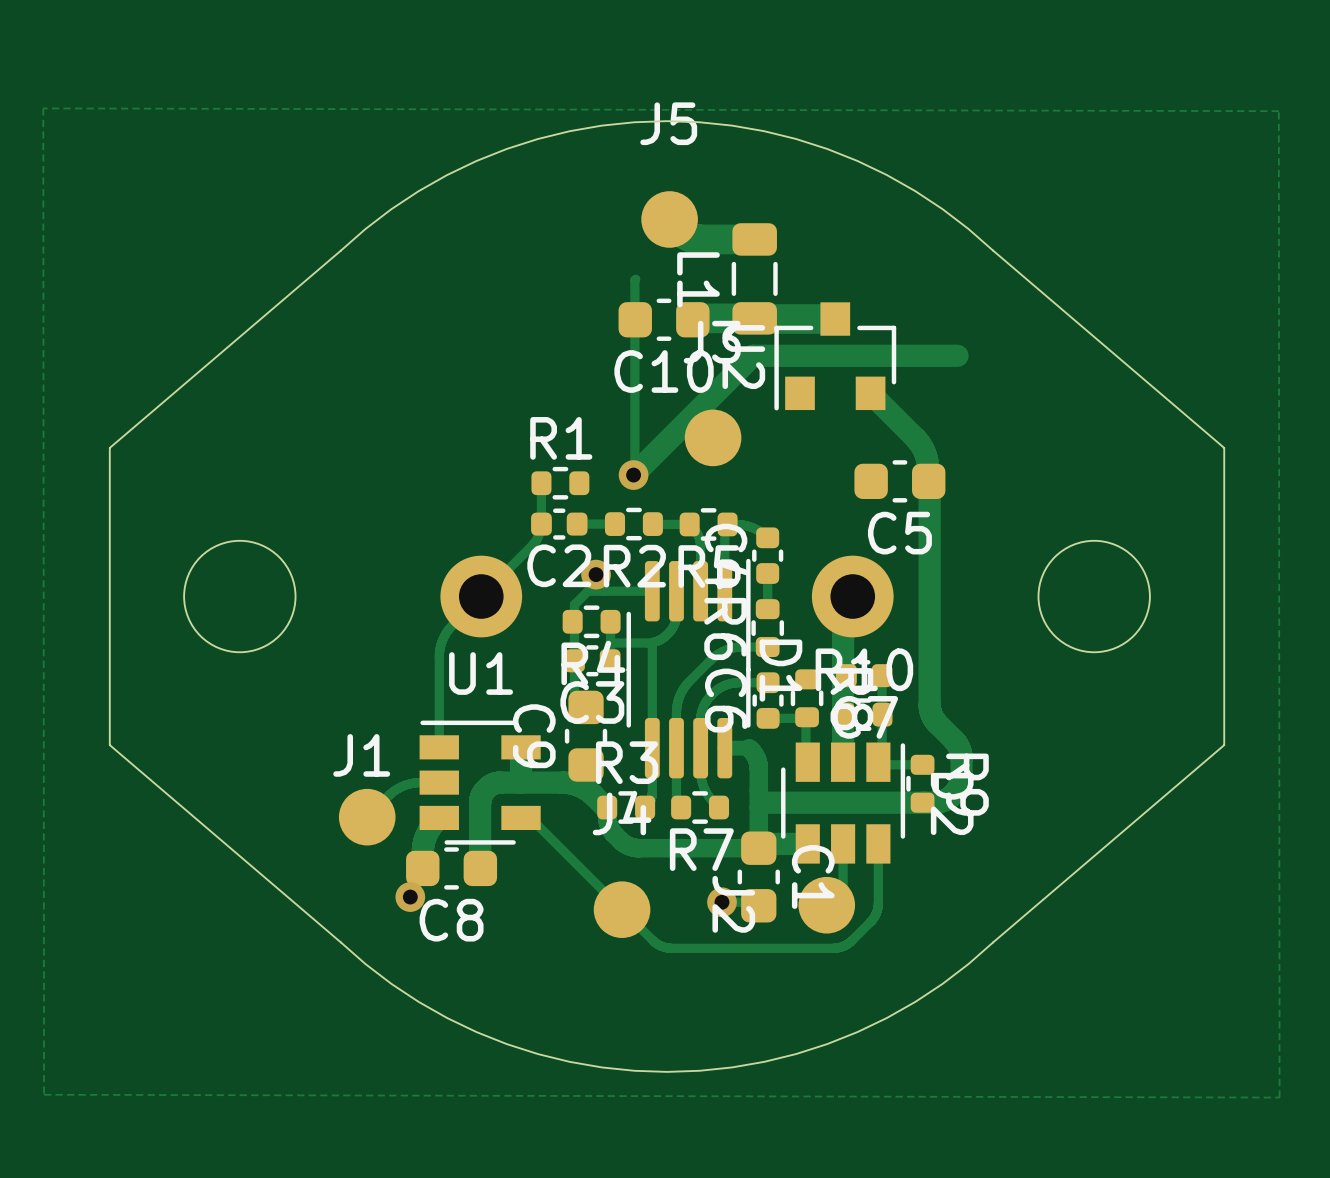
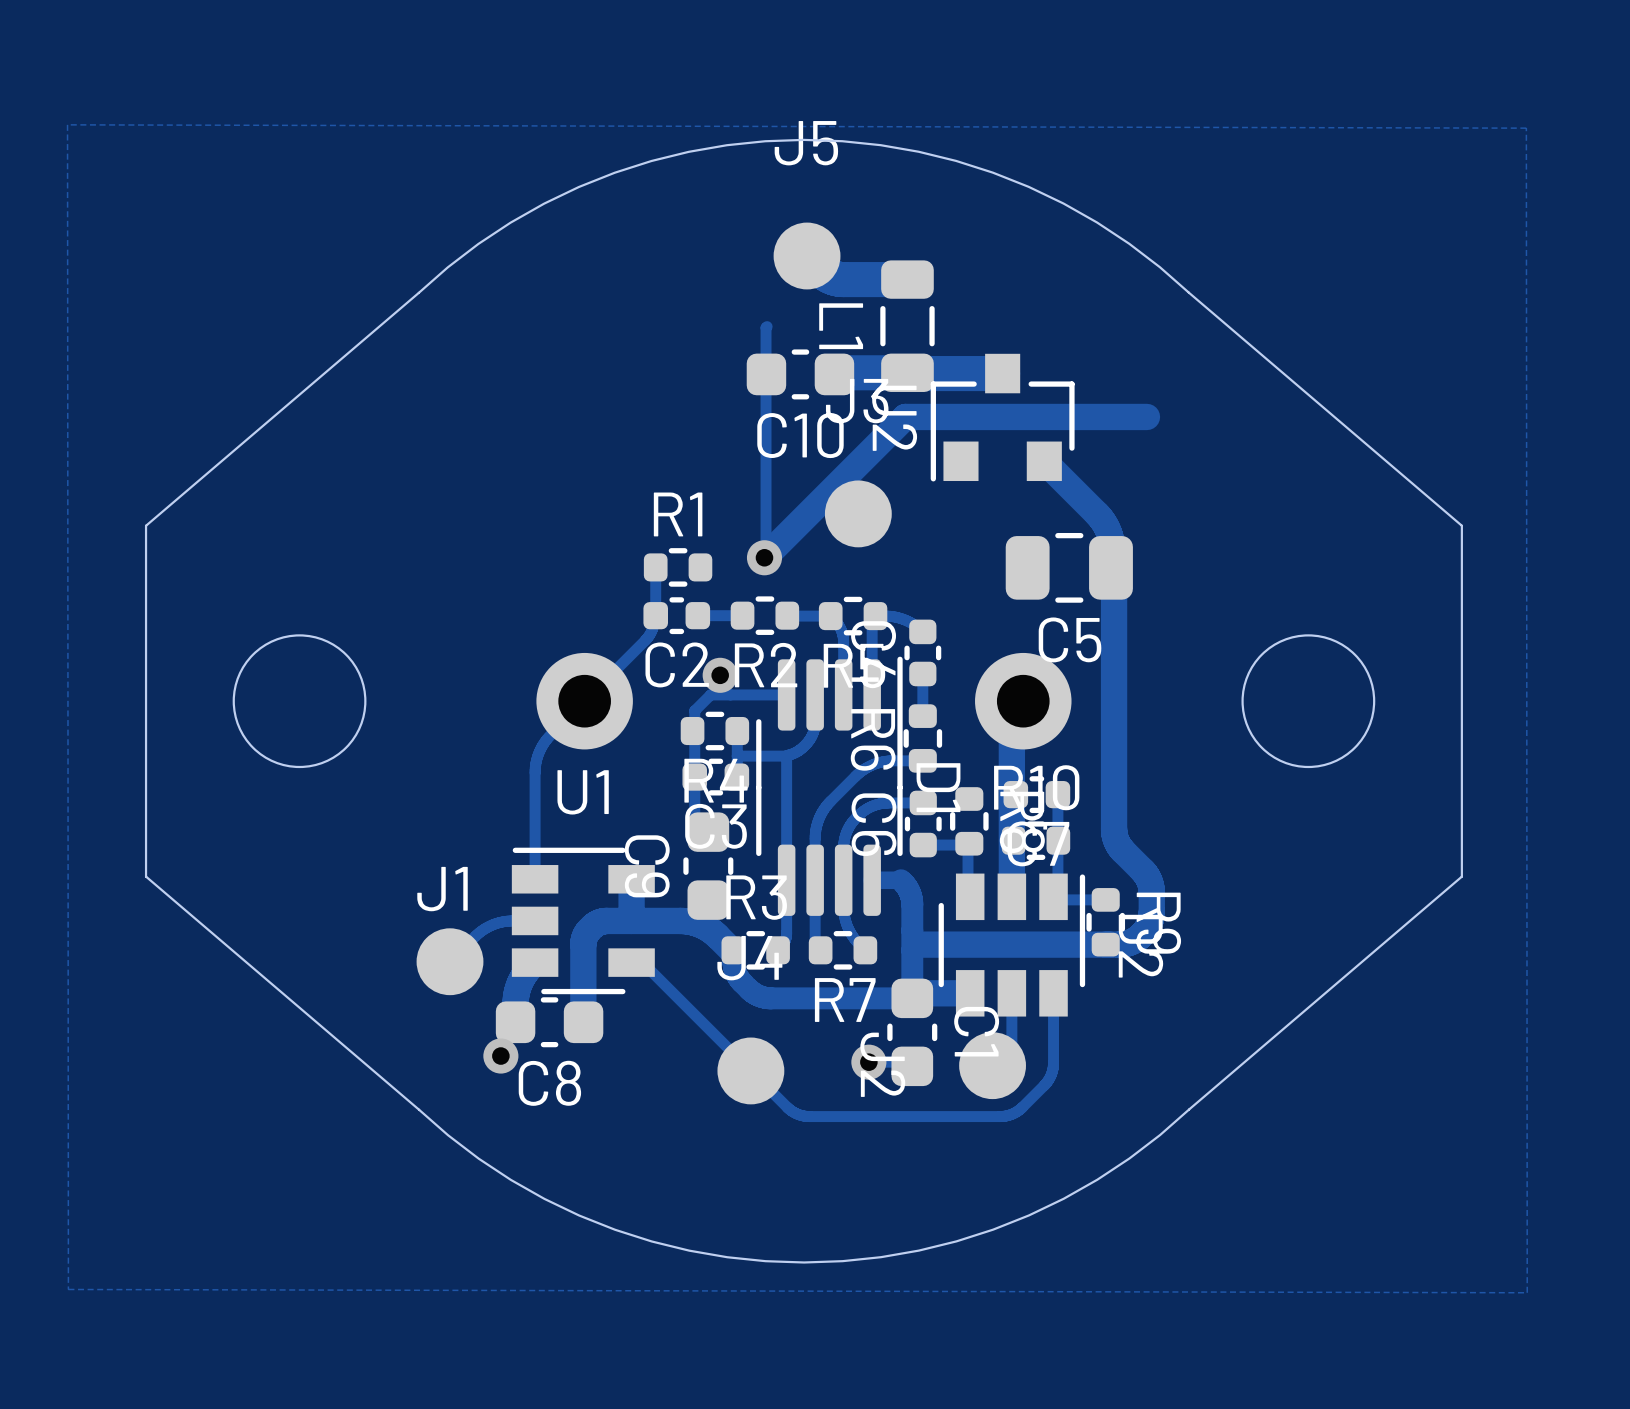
C5 footprint: [854, 460, 946, 503] -> [1005, 532, 1133, 603]
C5 name position: C5 (899, 533) -> C5 (1070, 639)

